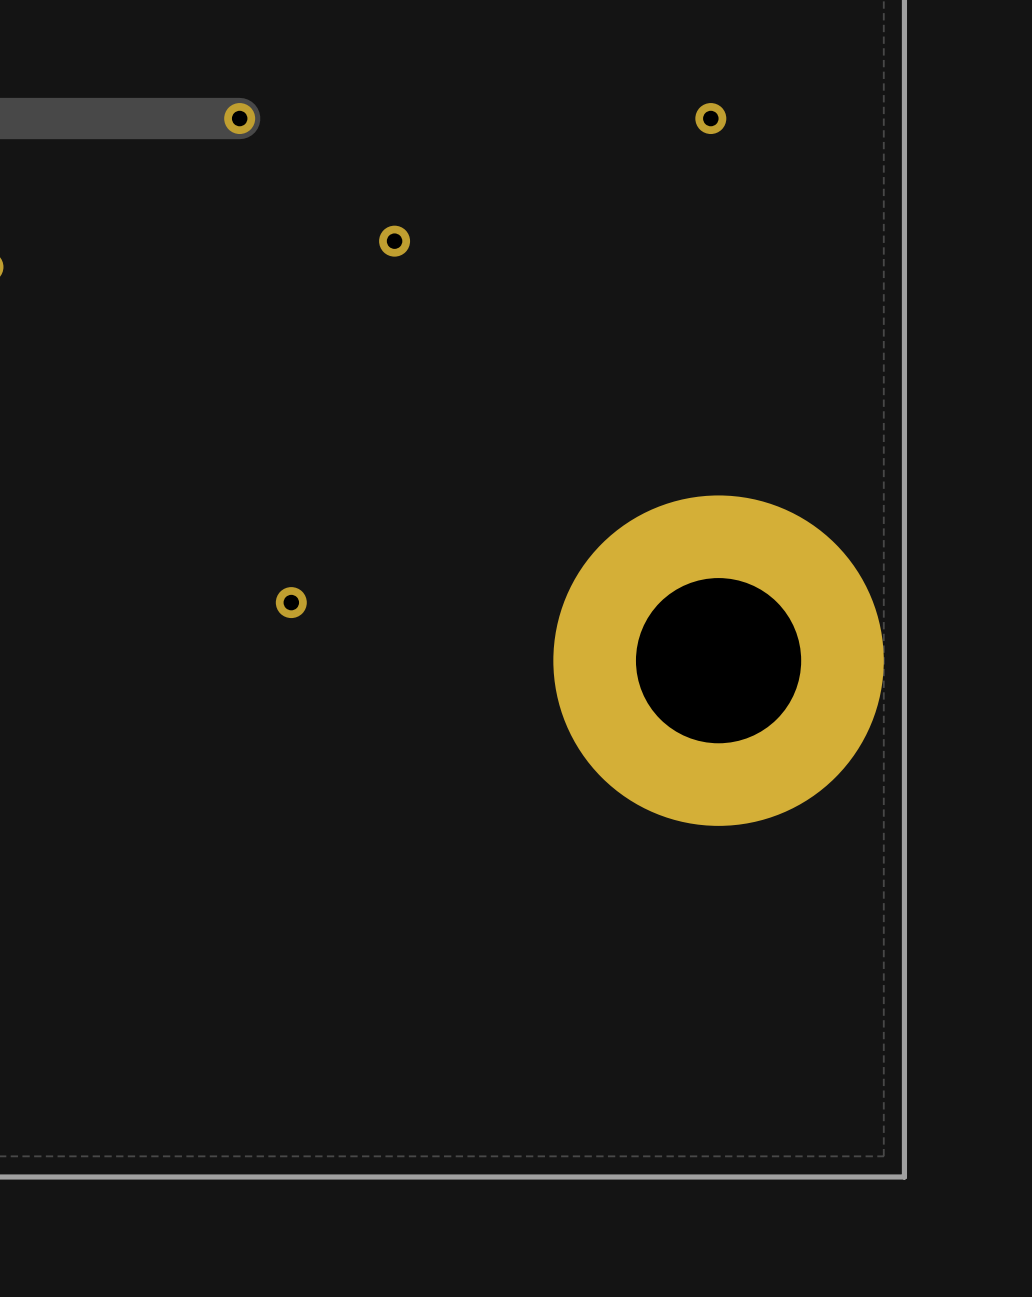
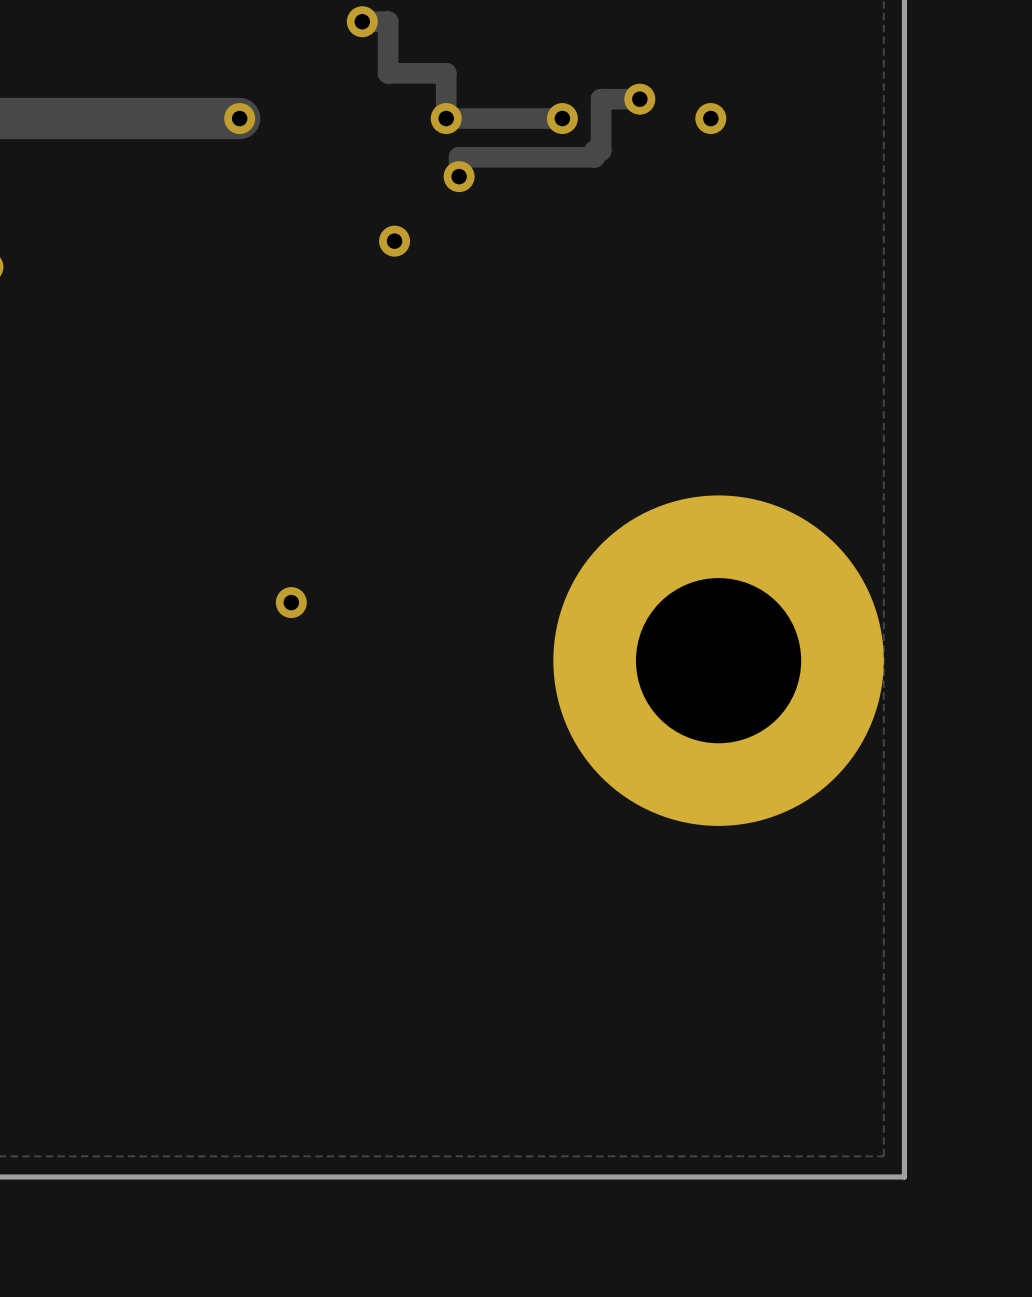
track: none -> (362, 21) (388, 21) (388, 73) (446, 73) (446, 118) (562, 118)
via: none -> (362, 21)
track: none -> (639, 99) (601, 99) (601, 150) (594, 150) (594, 157) (459, 157) (459, 176)
via: none -> (639, 99)
via: none -> (446, 118)
via: none -> (562, 118)
via: none -> (459, 176)

